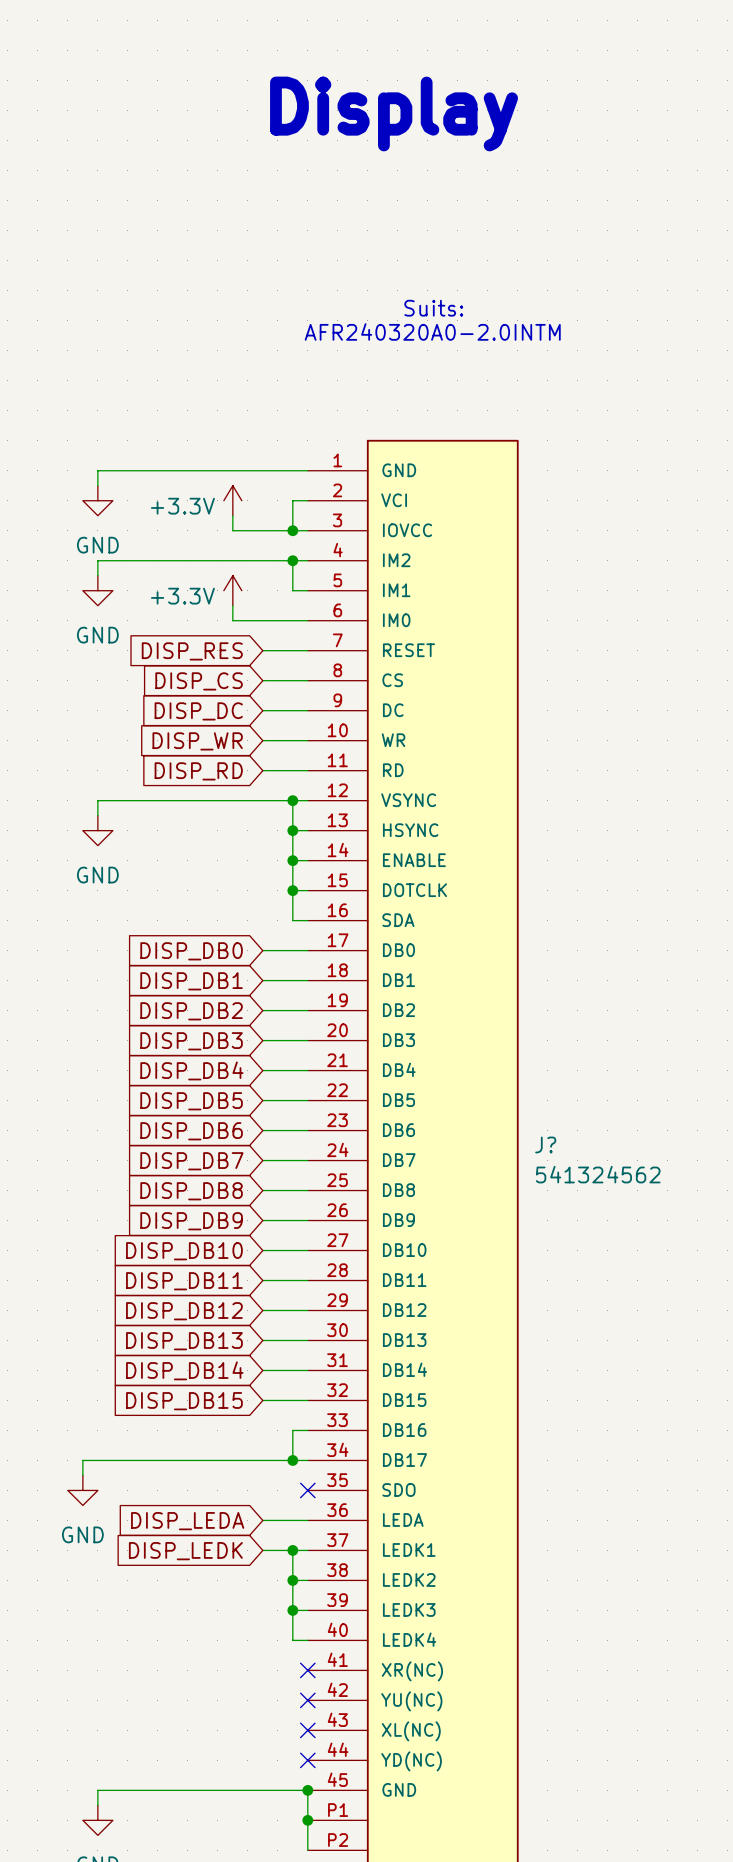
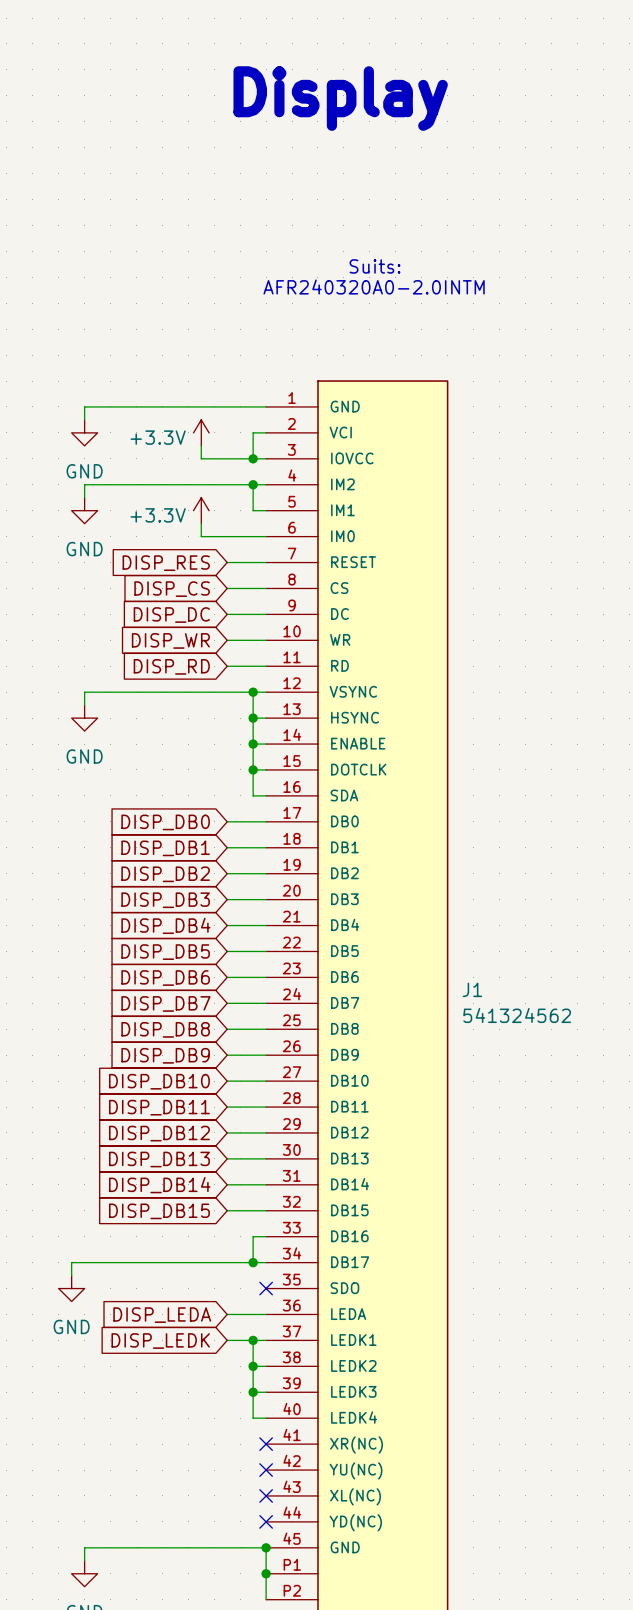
J? name: J? (545, 1144) -> J1 (472, 989)

